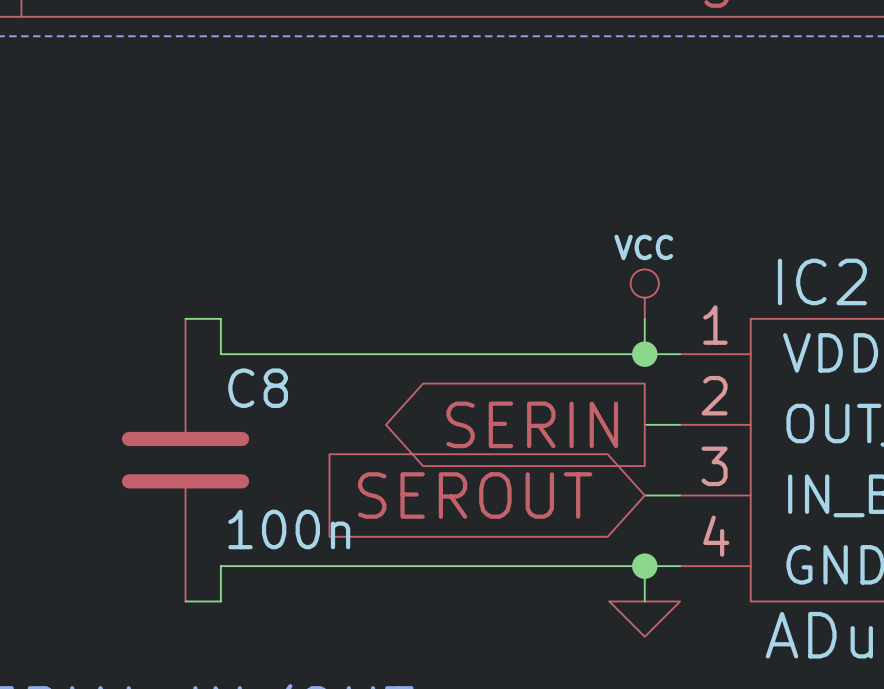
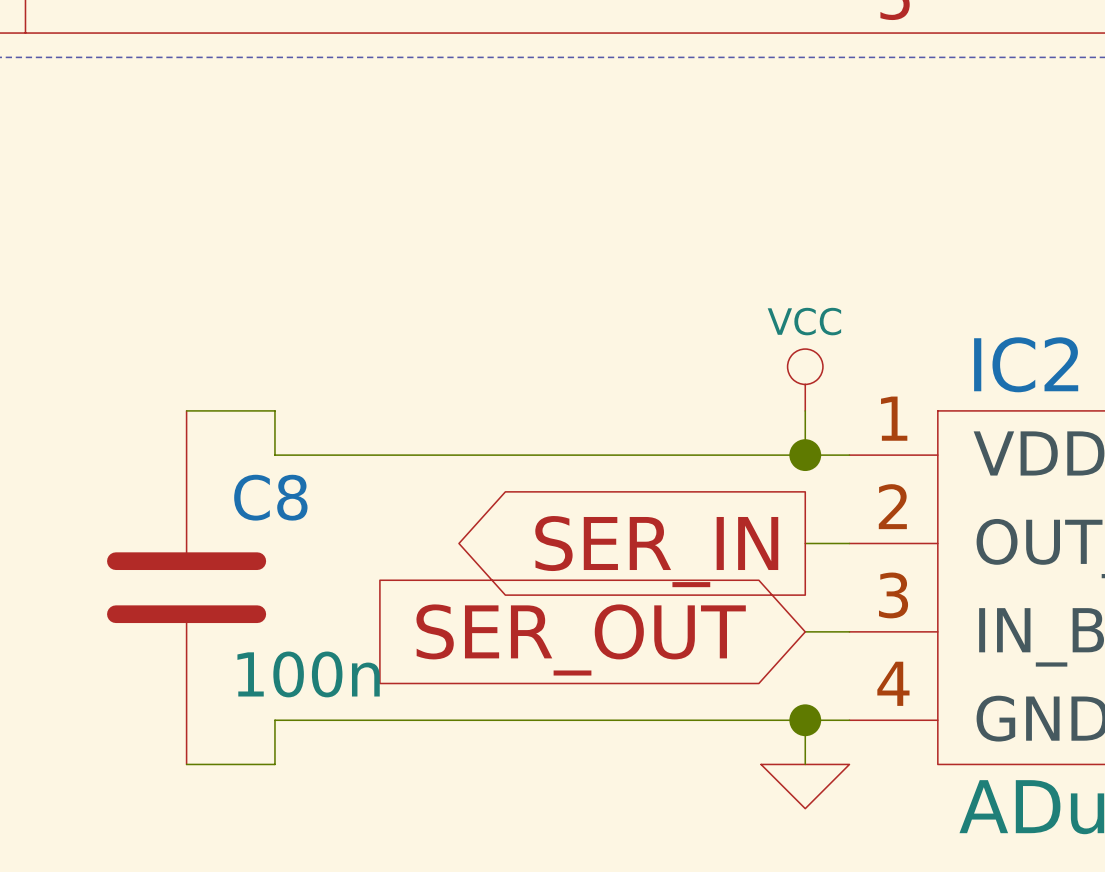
wire: none -> (186, 410) (230, 410)
global label: SERIN (532, 424) -> SER_IN (656, 551)
C8 position: (185, 460) -> (186, 587)
global label: SEROUT (475, 495) -> SER_OUT (581, 639)
wire: none -> (186, 764) (230, 764)

